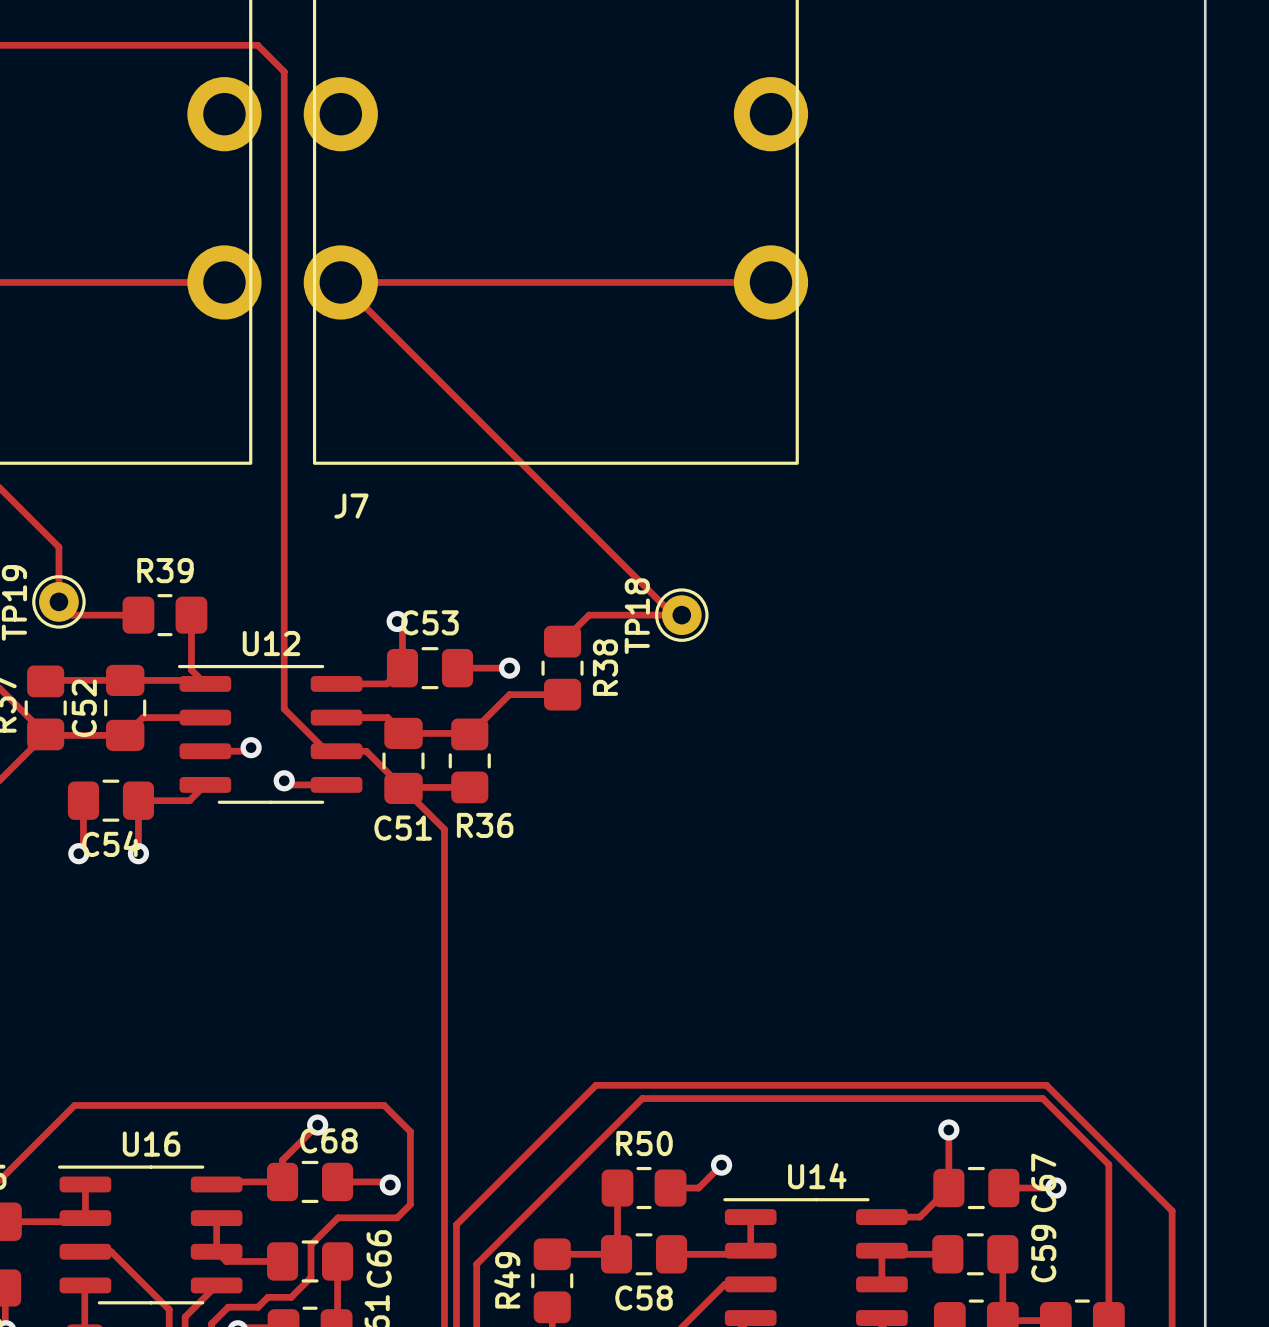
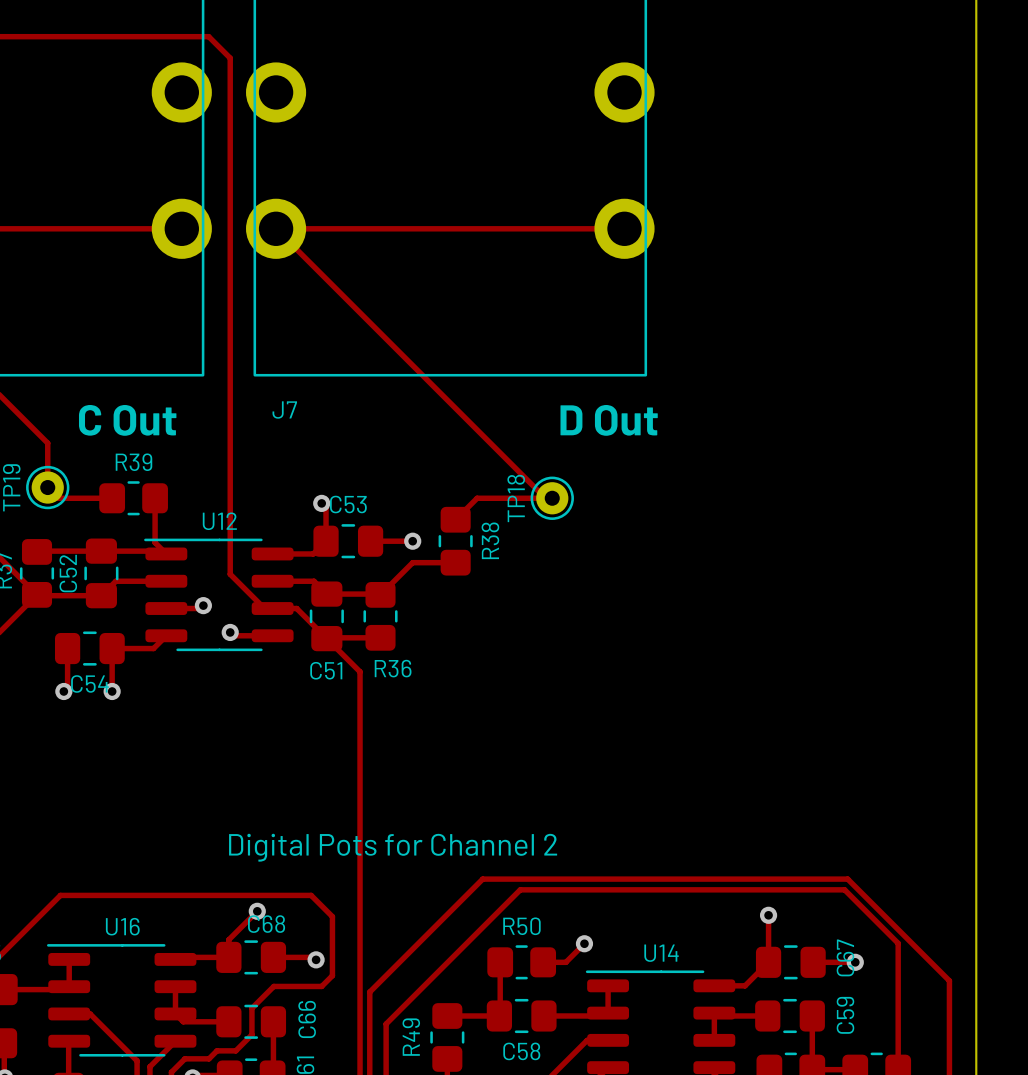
text: none -> C Out (127, 420)
text: none -> D Out (609, 420)
text: none -> Digital Pots for Channel 2 (393, 847)

